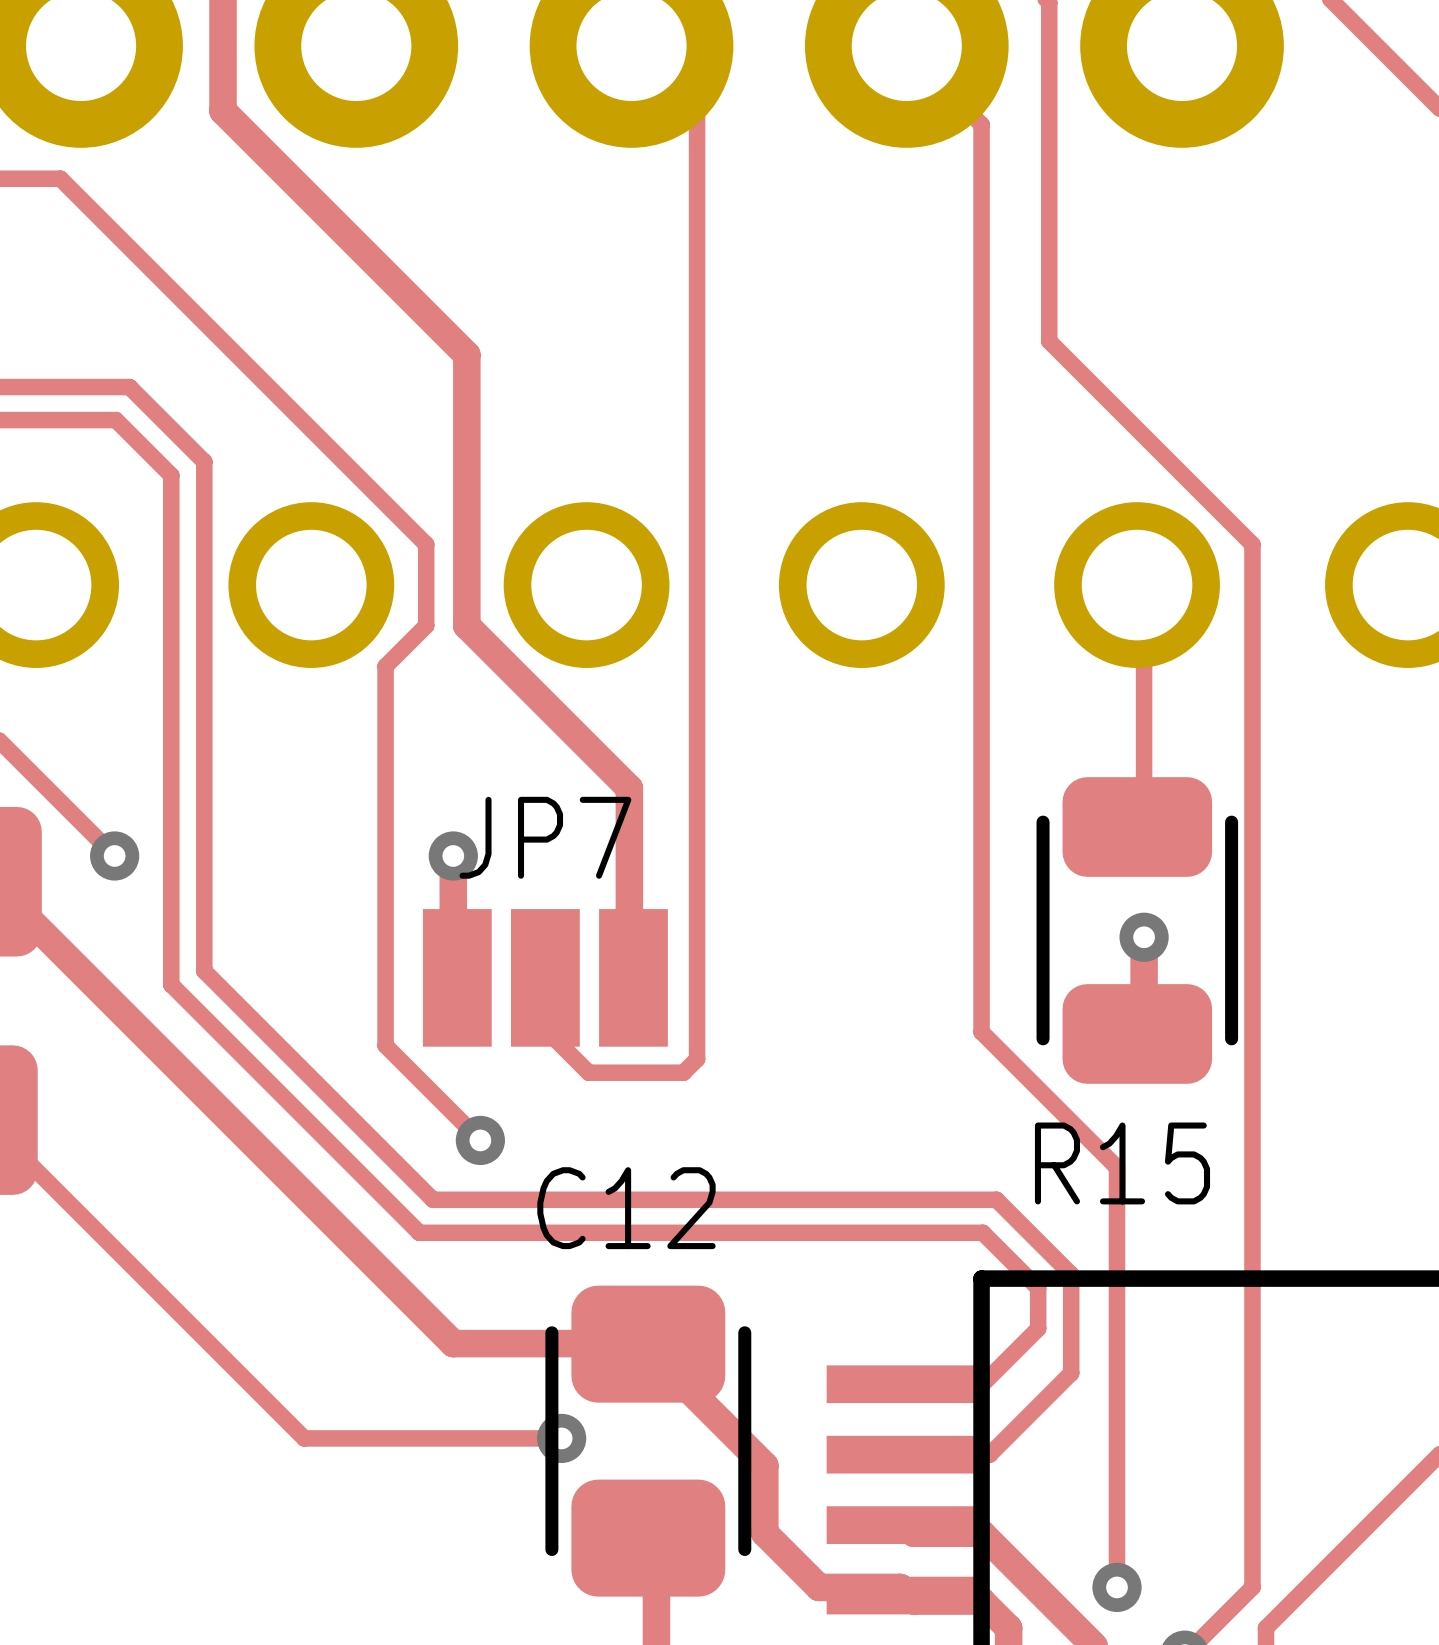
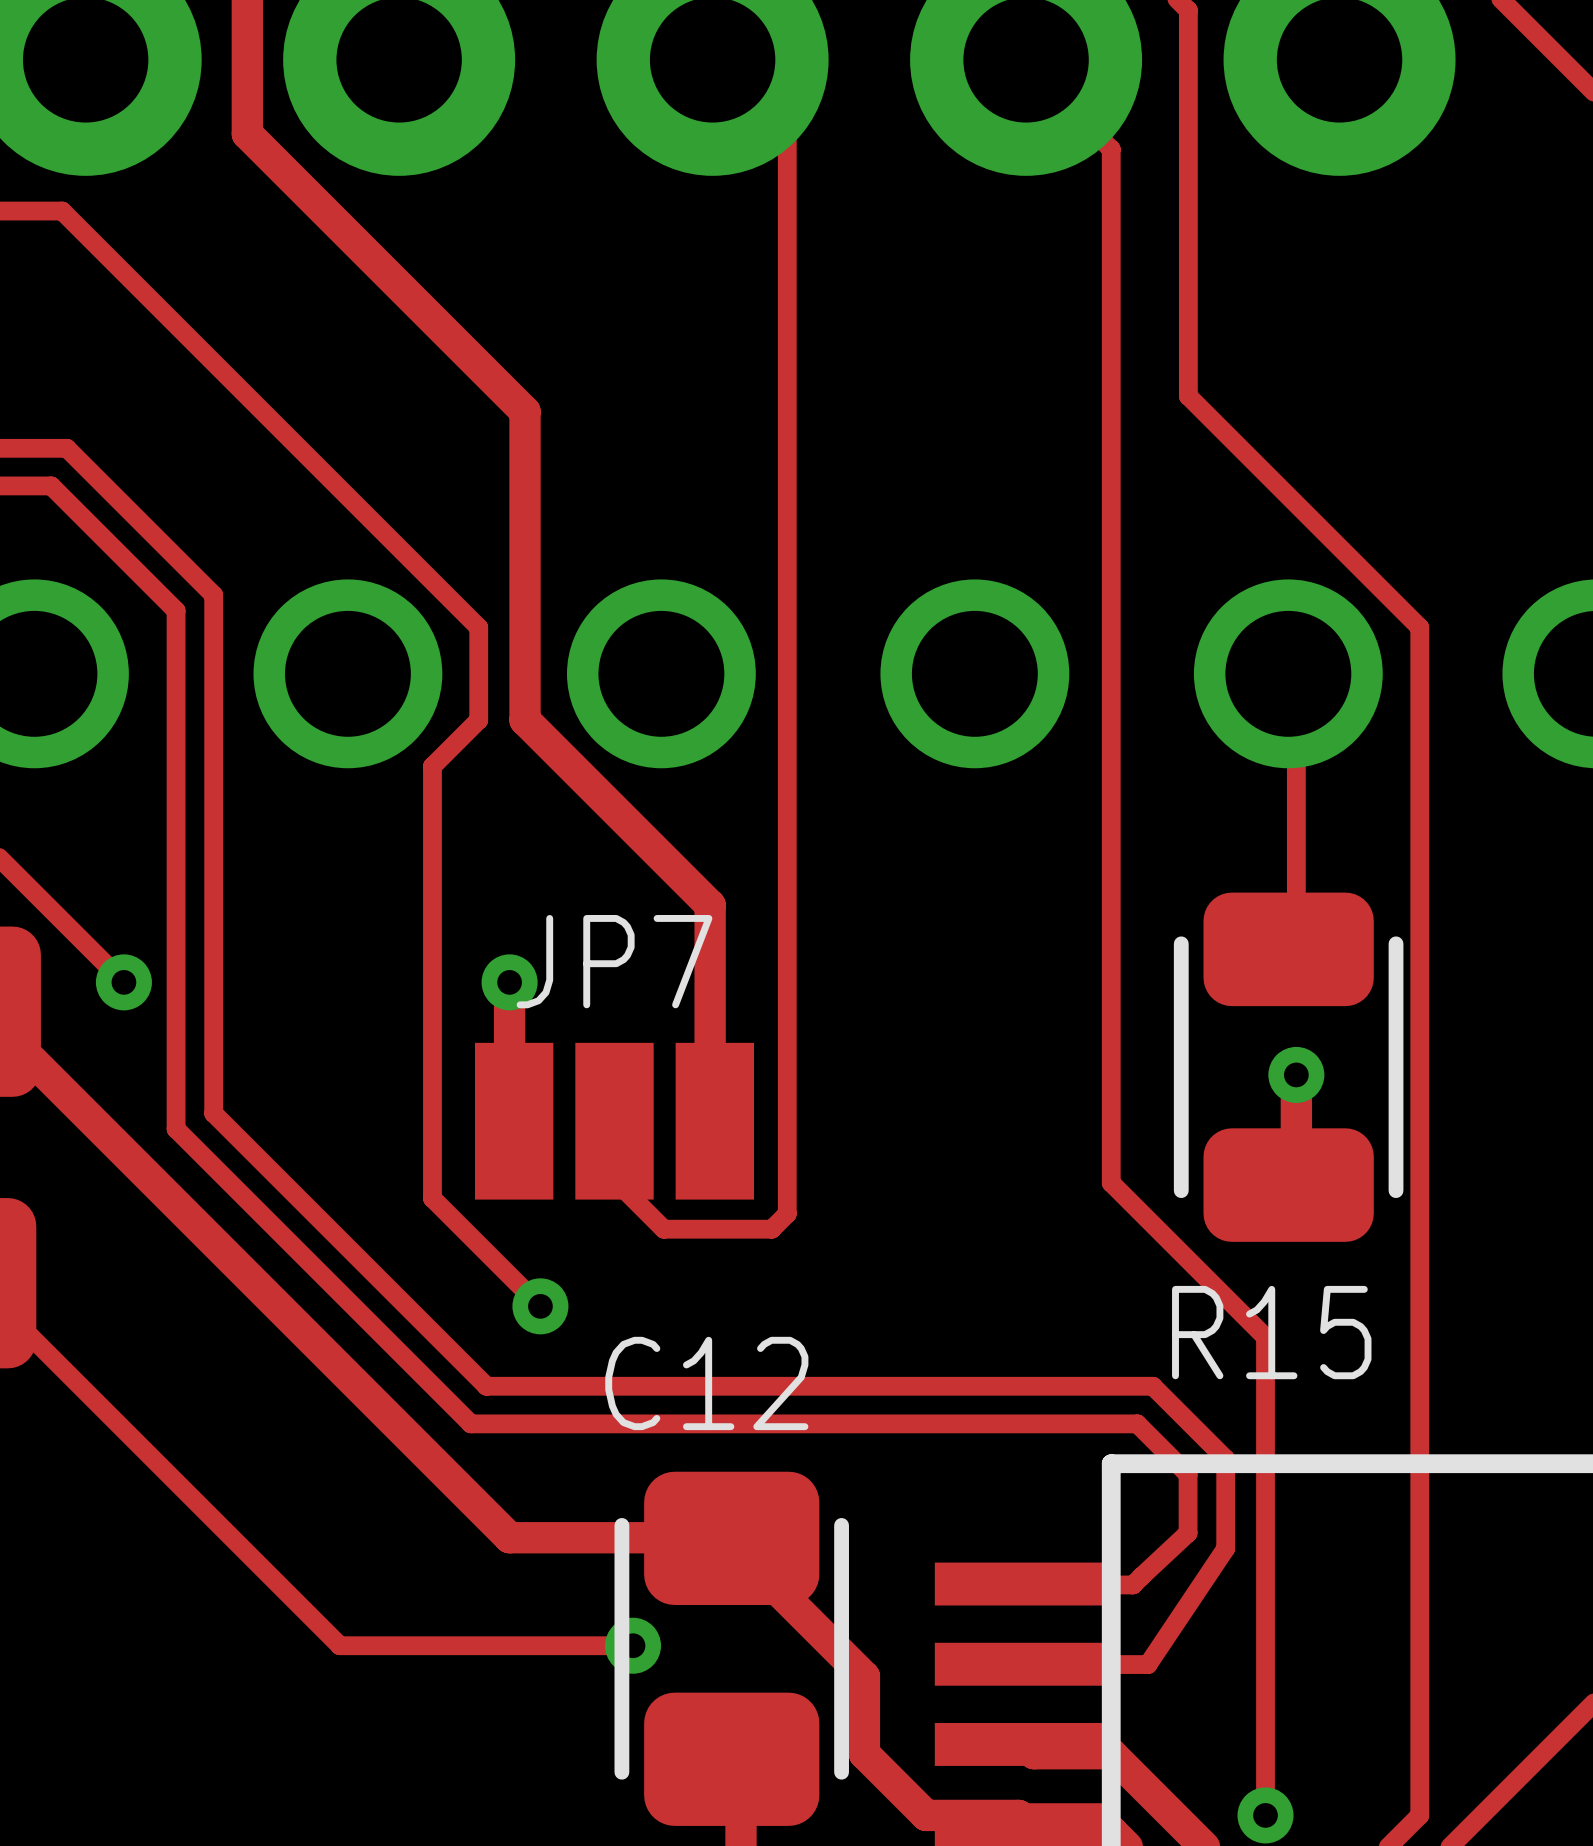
track: (64, 387) (129, 387) (204, 461) (204, 971) (433, 1199) (996, 1199) (1071, 1274) (1071, 1373) (989, 1454) -> (66, 448) (213, 595) (213, 1113) (486, 1386) (1152, 1386) (1225, 1458) (1225, 1548) (1148, 1664) (1120, 1664)
track: (50, 420) (115, 420) (171, 475) (171, 984) (419, 1232) (982, 1232) (1038, 1288) (1038, 1328) (978, 1388) (973, 1384) (902, 1384) -> (51, 485) (176, 610) (176, 1129) (470, 1423) (1137, 1423) (1188, 1474) (1188, 1533) (1133, 1584) (1020, 1584)

